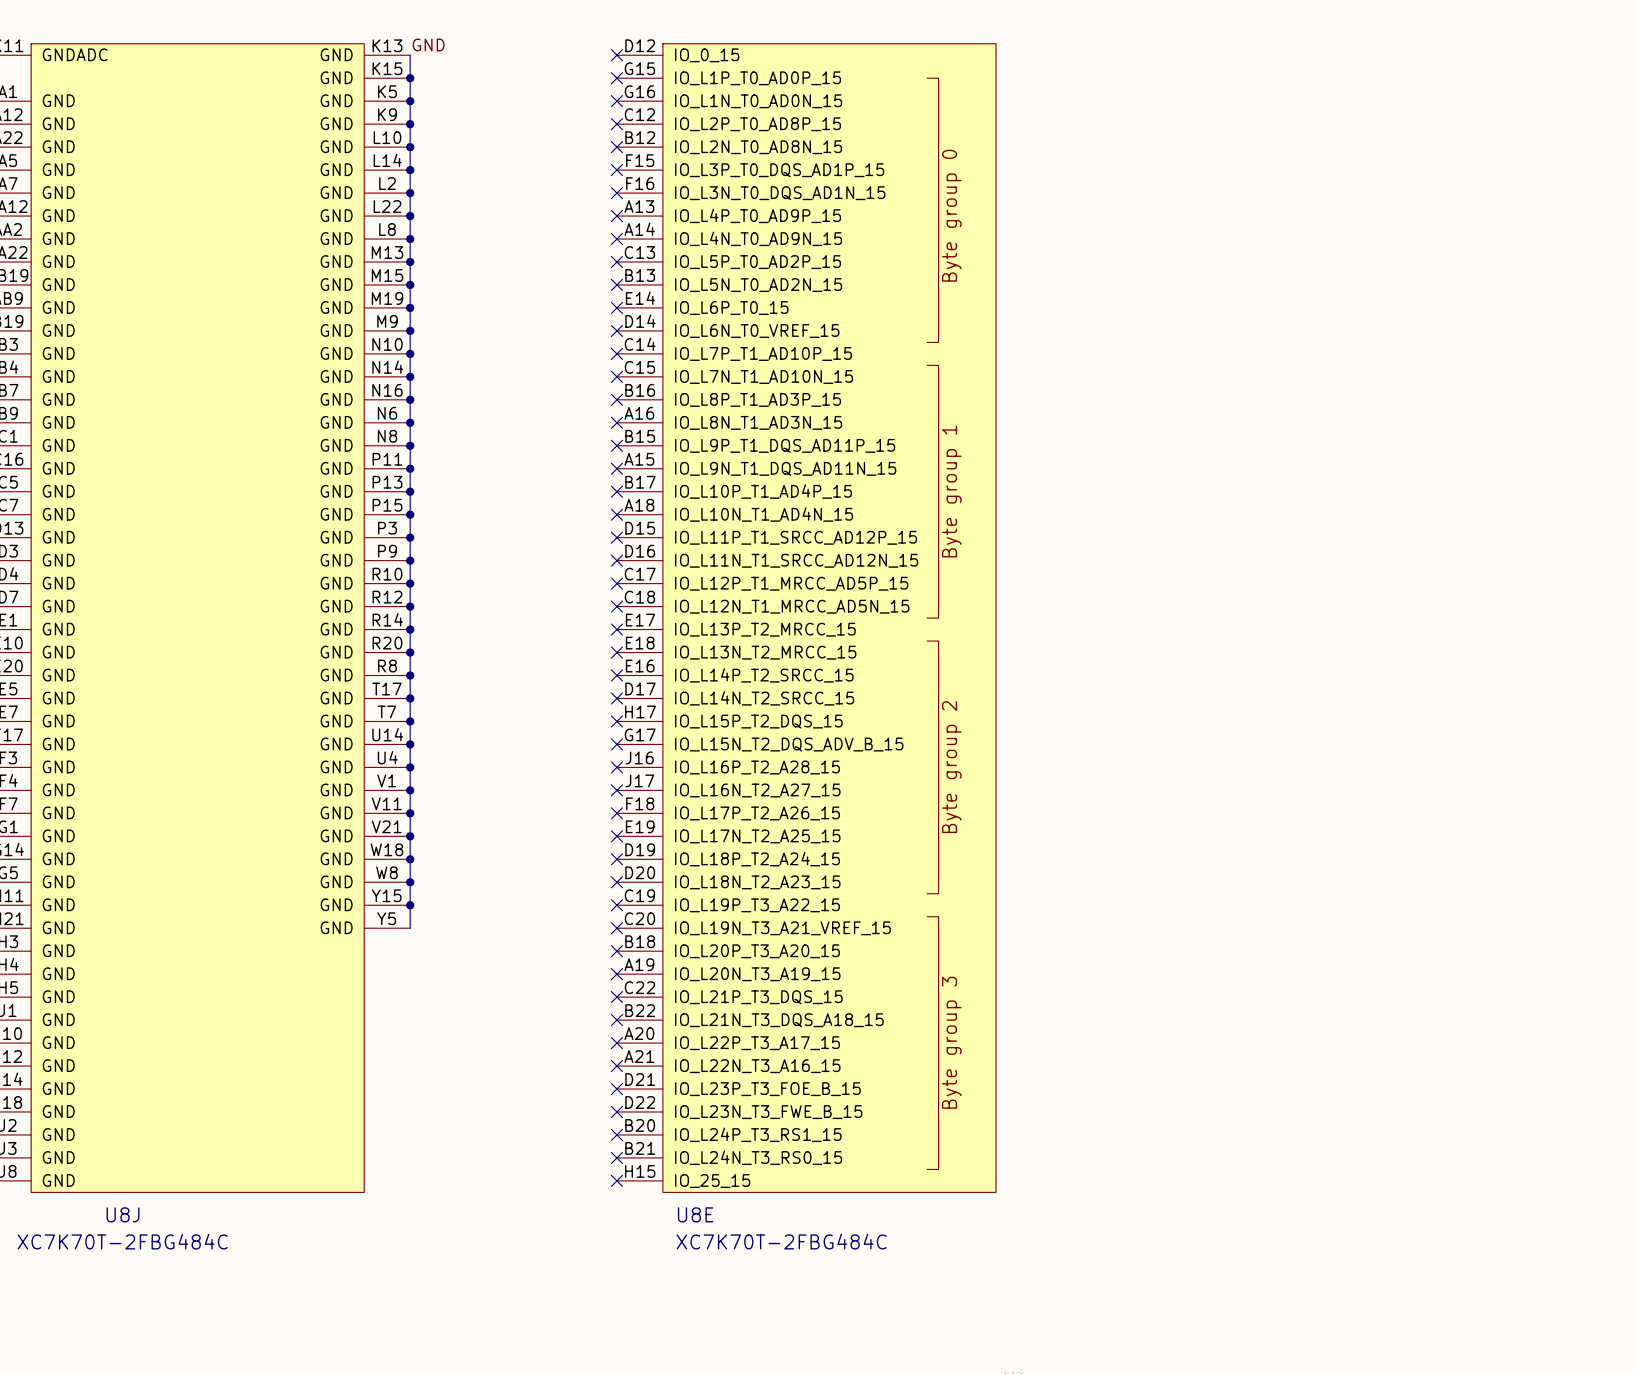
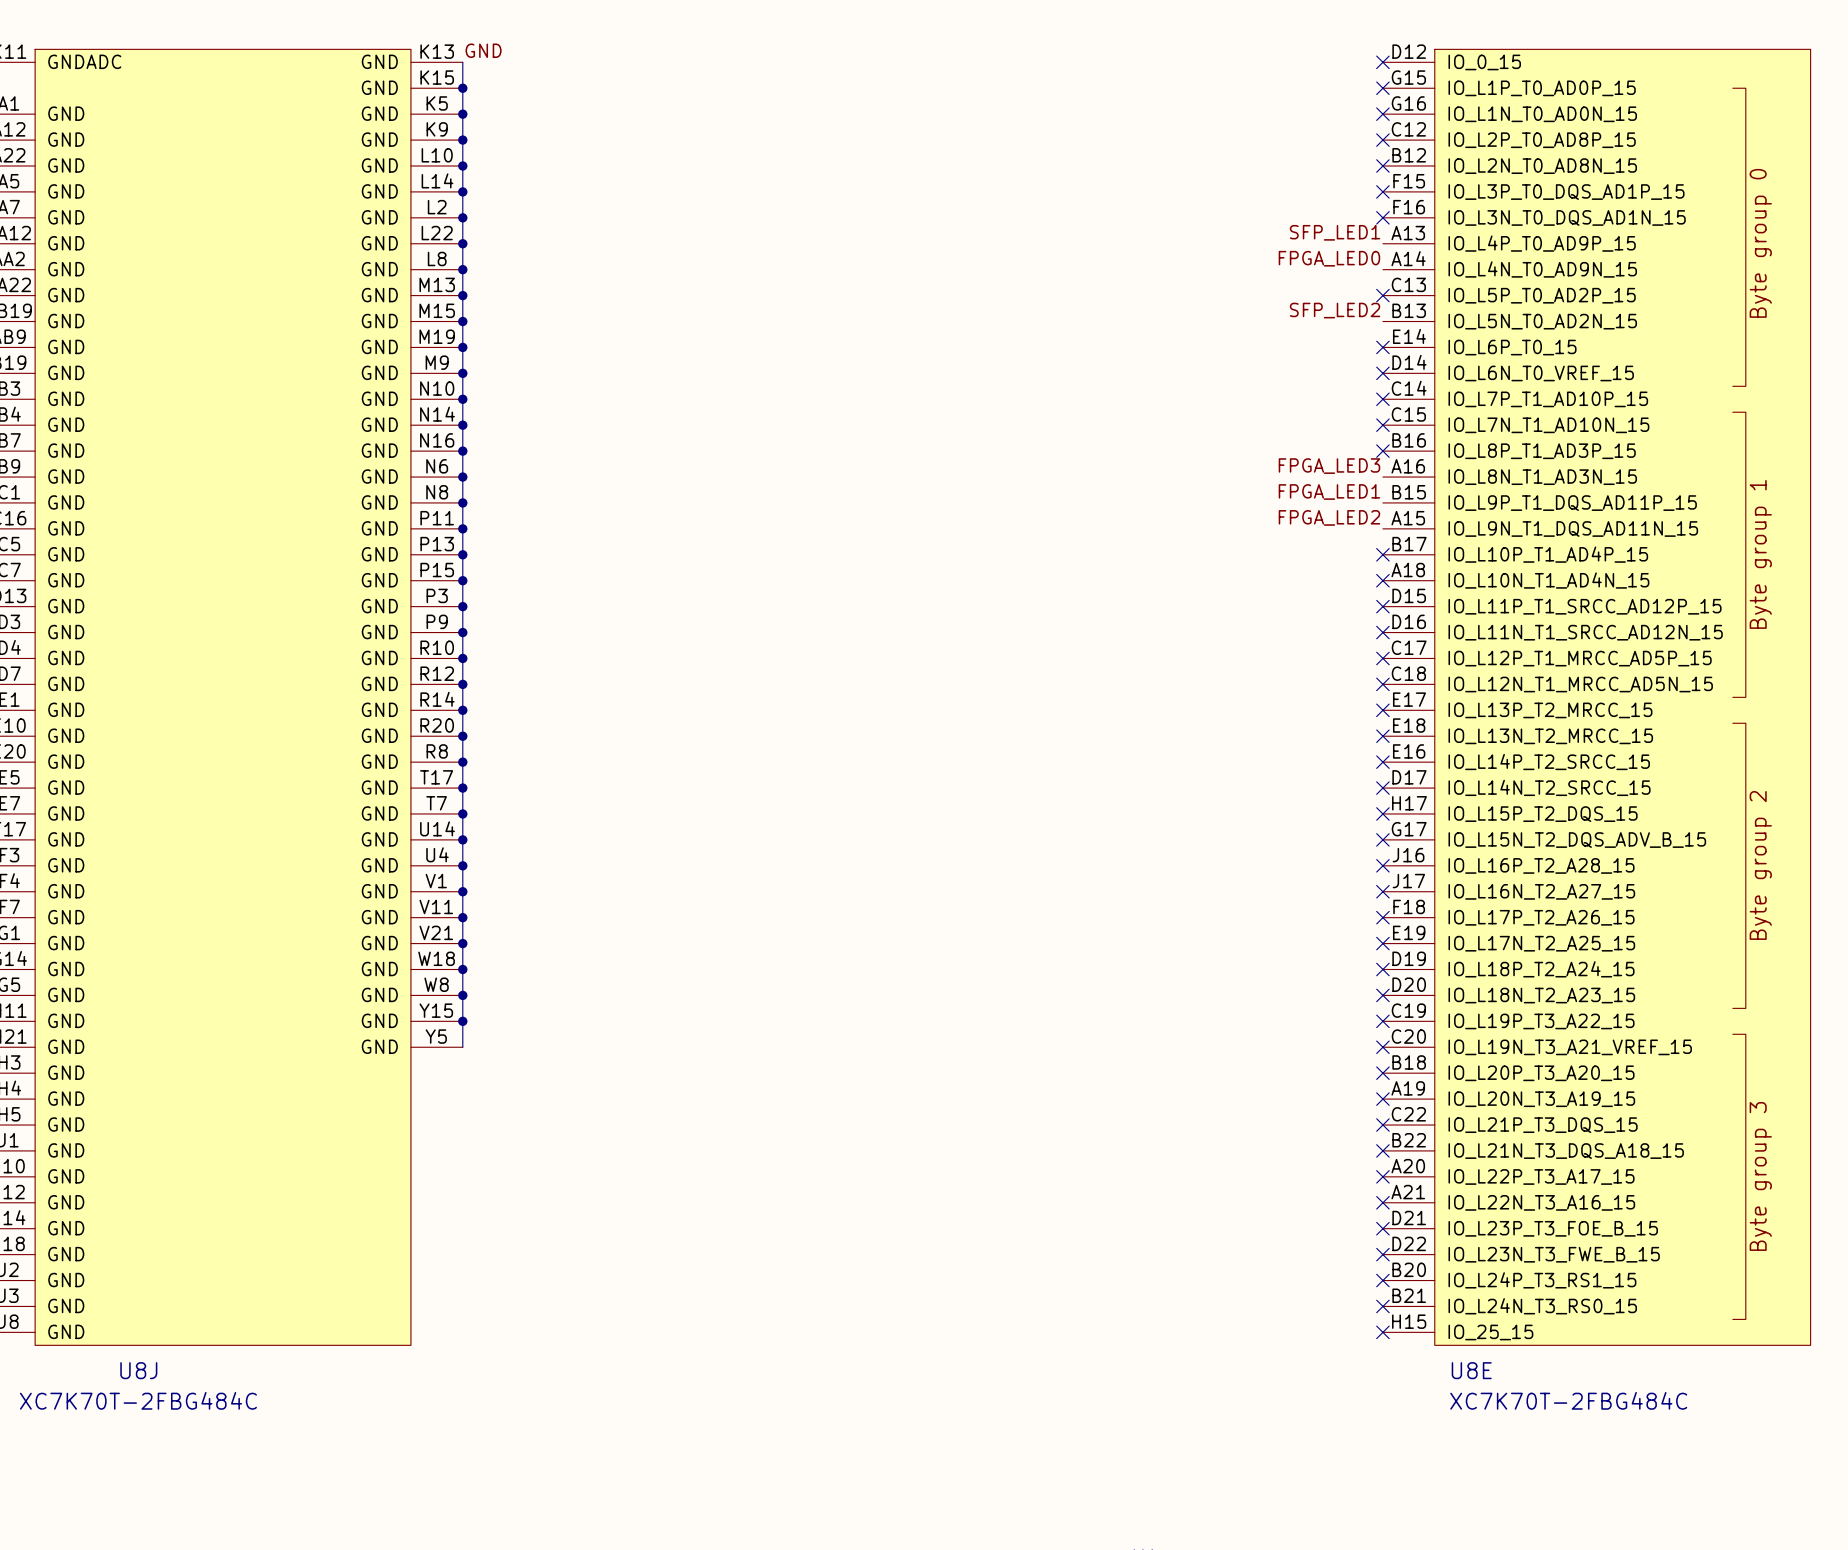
no-connect mark: (616, 55) -> none
no-connect mark: none -> (1382, 62)
no-connect mark: (616, 78) -> none
no-connect mark: none -> (1382, 88)
no-connect mark: (616, 101) -> none
no-connect mark: none -> (1382, 114)
no-connect mark: (616, 124) -> none
no-connect mark: none -> (1382, 140)
no-connect mark: (616, 147) -> none
no-connect mark: none -> (1382, 165)
no-connect mark: (616, 170) -> none
no-connect mark: none -> (1382, 191)
no-connect mark: (616, 193) -> none
no-connect mark: none -> (1382, 217)
label: none -> SFP_LED1 (1335, 232)
no-connect mark: (616, 216) -> none
label: none -> FPGA_LED0 (1329, 258)
no-connect mark: (616, 239) -> none
no-connect mark: (616, 261) -> none
no-connect mark: none -> (1382, 295)
label: none -> SFP_LED2 (1335, 310)
no-connect mark: (616, 284) -> none
no-connect mark: (616, 307) -> none
no-connect mark: none -> (1382, 347)
no-connect mark: (616, 330) -> none
no-connect mark: none -> (1382, 373)
no-connect mark: (616, 353) -> none
no-connect mark: none -> (1382, 399)
no-connect mark: (616, 376) -> none
no-connect mark: none -> (1382, 425)
no-connect mark: (616, 399) -> none
no-connect mark: none -> (1382, 451)
label: none -> FPGA_LED3 (1329, 466)
no-connect mark: (616, 422) -> none
label: none -> FPGA_LED1 (1329, 492)
no-connect mark: (616, 445) -> none
label: none -> FPGA_LED2 (1329, 517)
no-connect mark: (616, 468) -> none
no-connect mark: (616, 491) -> none
no-connect mark: none -> (1382, 554)
no-connect mark: (616, 514) -> none
no-connect mark: none -> (1382, 580)
no-connect mark: (616, 537) -> none
no-connect mark: none -> (1382, 606)
no-connect mark: (616, 560) -> none
no-connect mark: none -> (1382, 632)
no-connect mark: (616, 583) -> none
no-connect mark: none -> (1382, 658)
no-connect mark: (616, 606) -> none
no-connect mark: none -> (1382, 684)
U8E position: (806, 618) -> (1596, 697)
no-connect mark: (616, 629) -> none
no-connect mark: none -> (1382, 710)
no-connect mark: (616, 652) -> none
no-connect mark: none -> (1382, 736)
no-connect mark: (616, 675) -> none
no-connect mark: none -> (1382, 762)
no-connect mark: (616, 698) -> none
no-connect mark: none -> (1382, 788)
no-connect mark: (616, 721) -> none
no-connect mark: none -> (1382, 813)
no-connect mark: (616, 744) -> none
no-connect mark: none -> (1382, 839)
no-connect mark: (616, 767) -> none
no-connect mark: none -> (1382, 865)
no-connect mark: (616, 790) -> none
no-connect mark: none -> (1382, 891)
no-connect mark: (616, 813) -> none
no-connect mark: none -> (1382, 917)
no-connect mark: (616, 836) -> none
no-connect mark: none -> (1382, 943)
no-connect mark: (616, 859) -> none
no-connect mark: none -> (1382, 969)
no-connect mark: (616, 882) -> none
no-connect mark: none -> (1382, 995)
no-connect mark: (616, 905) -> none
no-connect mark: none -> (1382, 1021)
no-connect mark: (616, 928) -> none
no-connect mark: none -> (1382, 1047)
no-connect mark: (616, 951) -> none
no-connect mark: none -> (1382, 1073)
no-connect mark: (616, 974) -> none
no-connect mark: none -> (1382, 1099)
no-connect mark: (616, 997) -> none
no-connect mark: none -> (1382, 1125)
no-connect mark: (616, 1020) -> none
no-connect mark: none -> (1382, 1150)
no-connect mark: (616, 1043) -> none
no-connect mark: none -> (1382, 1176)
no-connect mark: (616, 1066) -> none
no-connect mark: none -> (1382, 1202)
no-connect mark: (616, 1089) -> none
no-connect mark: none -> (1382, 1228)
no-connect mark: (616, 1111) -> none
no-connect mark: none -> (1382, 1254)
no-connect mark: (616, 1134) -> none
no-connect mark: none -> (1382, 1280)
no-connect mark: (616, 1157) -> none
no-connect mark: none -> (1382, 1306)
no-connect mark: (616, 1180) -> none
no-connect mark: none -> (1382, 1332)

